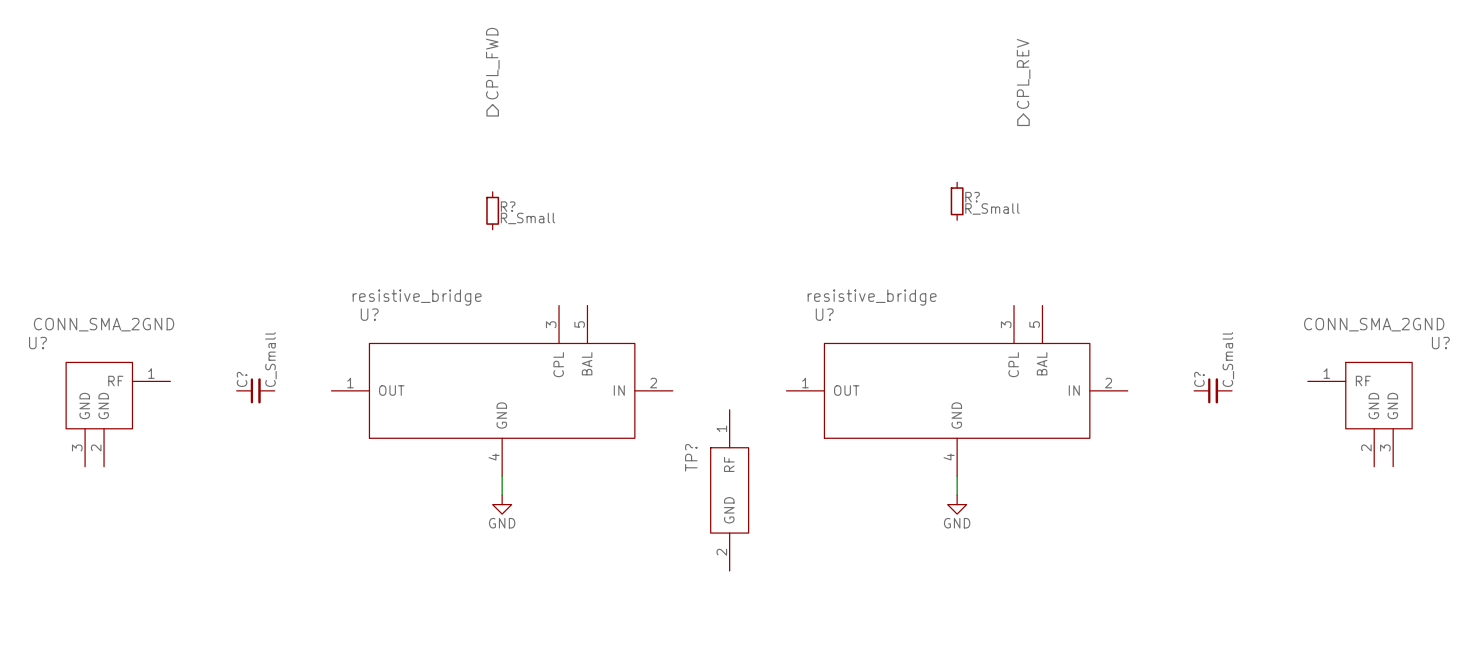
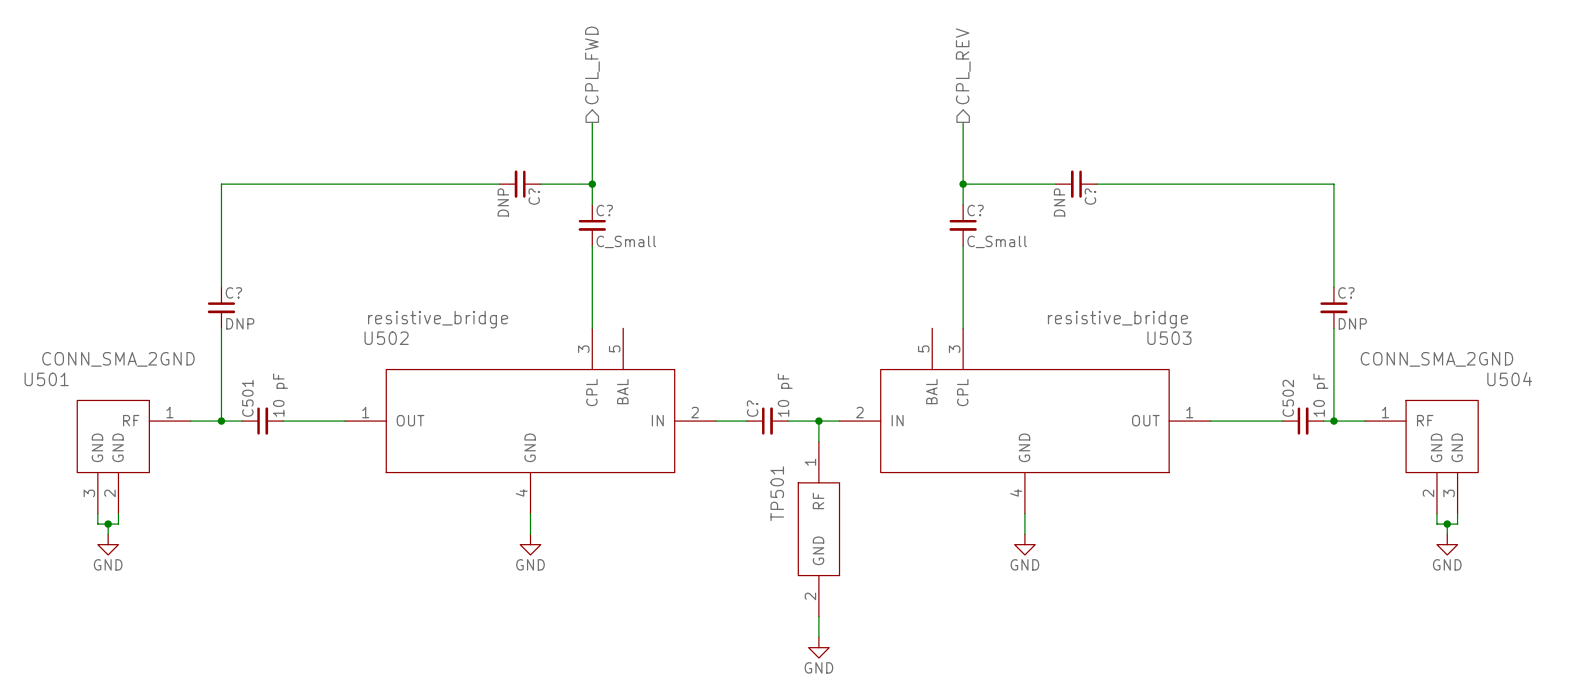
hierarchical label position: CPL_FWD (492, 63) -> CPL_FWD (592, 65)
hierarchical label position: CPL_REV (1023, 73) -> CPL_REV (963, 66)
wire: none -> (592, 122) (592, 204)
wire: none -> (963, 122) (963, 204)
wire: none -> (499, 184) (221, 184) (221, 287)
C?: none -> DNP (520, 184)
wire: none -> (540, 184) (592, 184)
junction: none -> (592, 184)
wire: none -> (963, 184) (1055, 184)
junction: none -> (963, 184)
C?: none -> DNP (1076, 184)
wire: none -> (1097, 184) (1333, 184) (1333, 287)
R?: R_Small (957, 201) -> none
R?: R_Small (492, 210) -> none
C?: none -> C_Small (592, 225)
C?: none -> C_Small (963, 225)
wire: none -> (592, 245) (592, 328)
wire: none -> (963, 245) (963, 328)
C?: none -> DNP (221, 307)
C?: none -> DNP (1333, 307)
wire: none -> (221, 328) (221, 421)
wire: none -> (1333, 328) (1333, 421)
U? name: U? (369, 314) -> U502 (386, 338)
C? value: C_Small (270, 359) -> 10 pF (280, 395)
C? value: C_Small (1228, 359) -> 10 pF (1320, 395)
C? name: C? (242, 379) -> C501 (247, 398)
C? name: C? (1199, 379) -> C502 (1288, 398)
wire: none -> (190, 421) (242, 421)
junction: none -> (221, 421)
wire: none -> (283, 421) (345, 421)
wire: none -> (715, 421) (746, 421)
C?: none -> 10 pF (767, 421)
wire: none -> (788, 421) (839, 421)
wire: none -> (818, 421) (818, 441)
junction: none -> (818, 421)
U?: resistive_bridge (957, 390) -> none
U503: none -> resistive_bridge (1024, 421)
wire: none -> (1210, 421) (1282, 421)
wire: none -> (1323, 421) (1364, 421)
junction: none -> (1333, 421)
U?: CONN_SMA_2GND (118, 414) -> none
U?: CONN_SMA_2GND (1359, 414) -> none
U501: none -> CONN_SMA_2GND (133, 457)
U504: none -> CONN_SMA_2GND (1421, 457)
wire: none -> (97, 513) (97, 524) (118, 524) (118, 513)
wire: none -> (1436, 513) (1436, 524) (1457, 524) (1457, 513)
wire: none -> (108, 524) (108, 534)
junction: none -> (108, 524)
wire: none -> (1447, 524) (1447, 534)
junction: none -> (1447, 524)
TP?: (729, 490) -> none
TP501: none -> (818, 529)
power symbol: none -> GND (108, 544)
power symbol: none -> GND (1447, 544)
wire: none -> (818, 616) (818, 637)
power symbol: none -> GND (818, 647)

